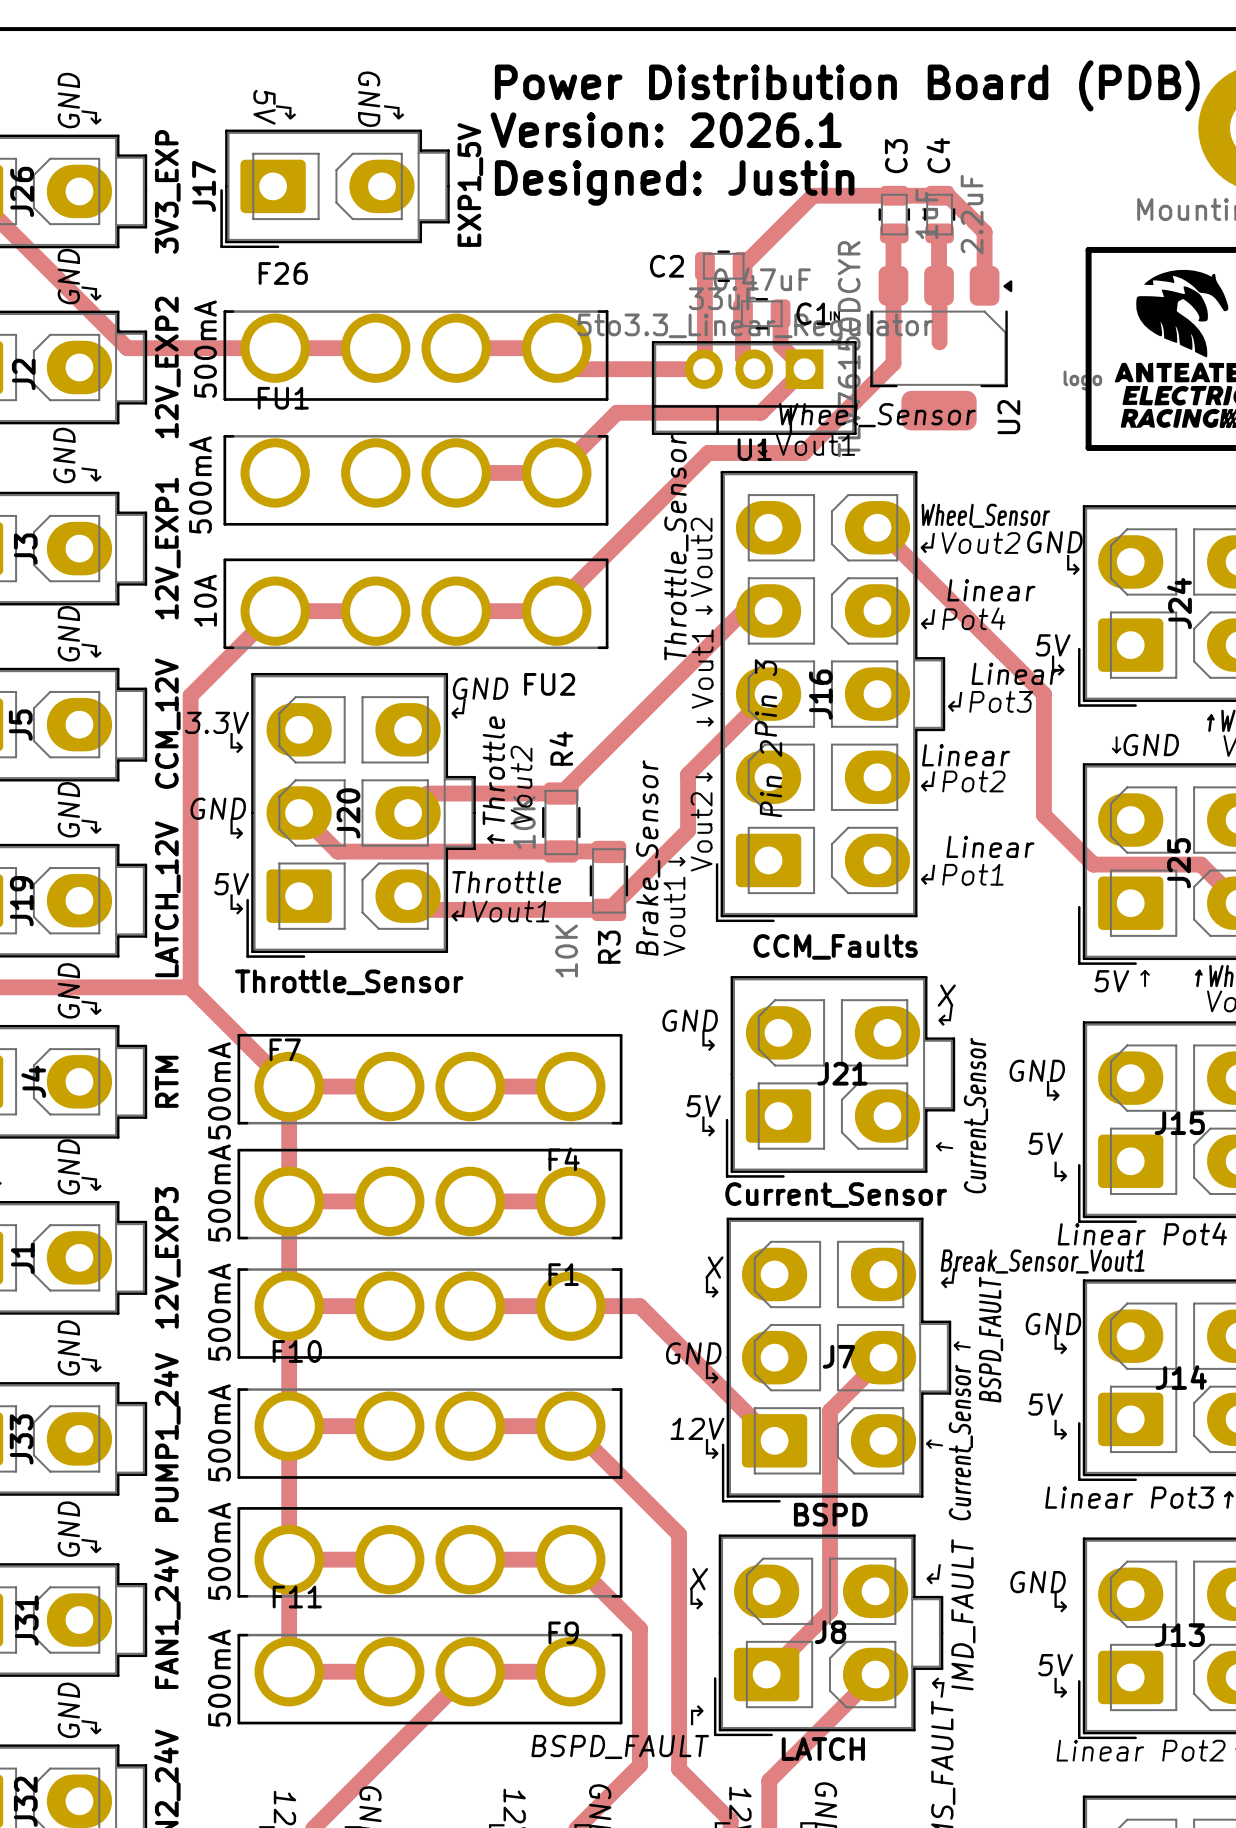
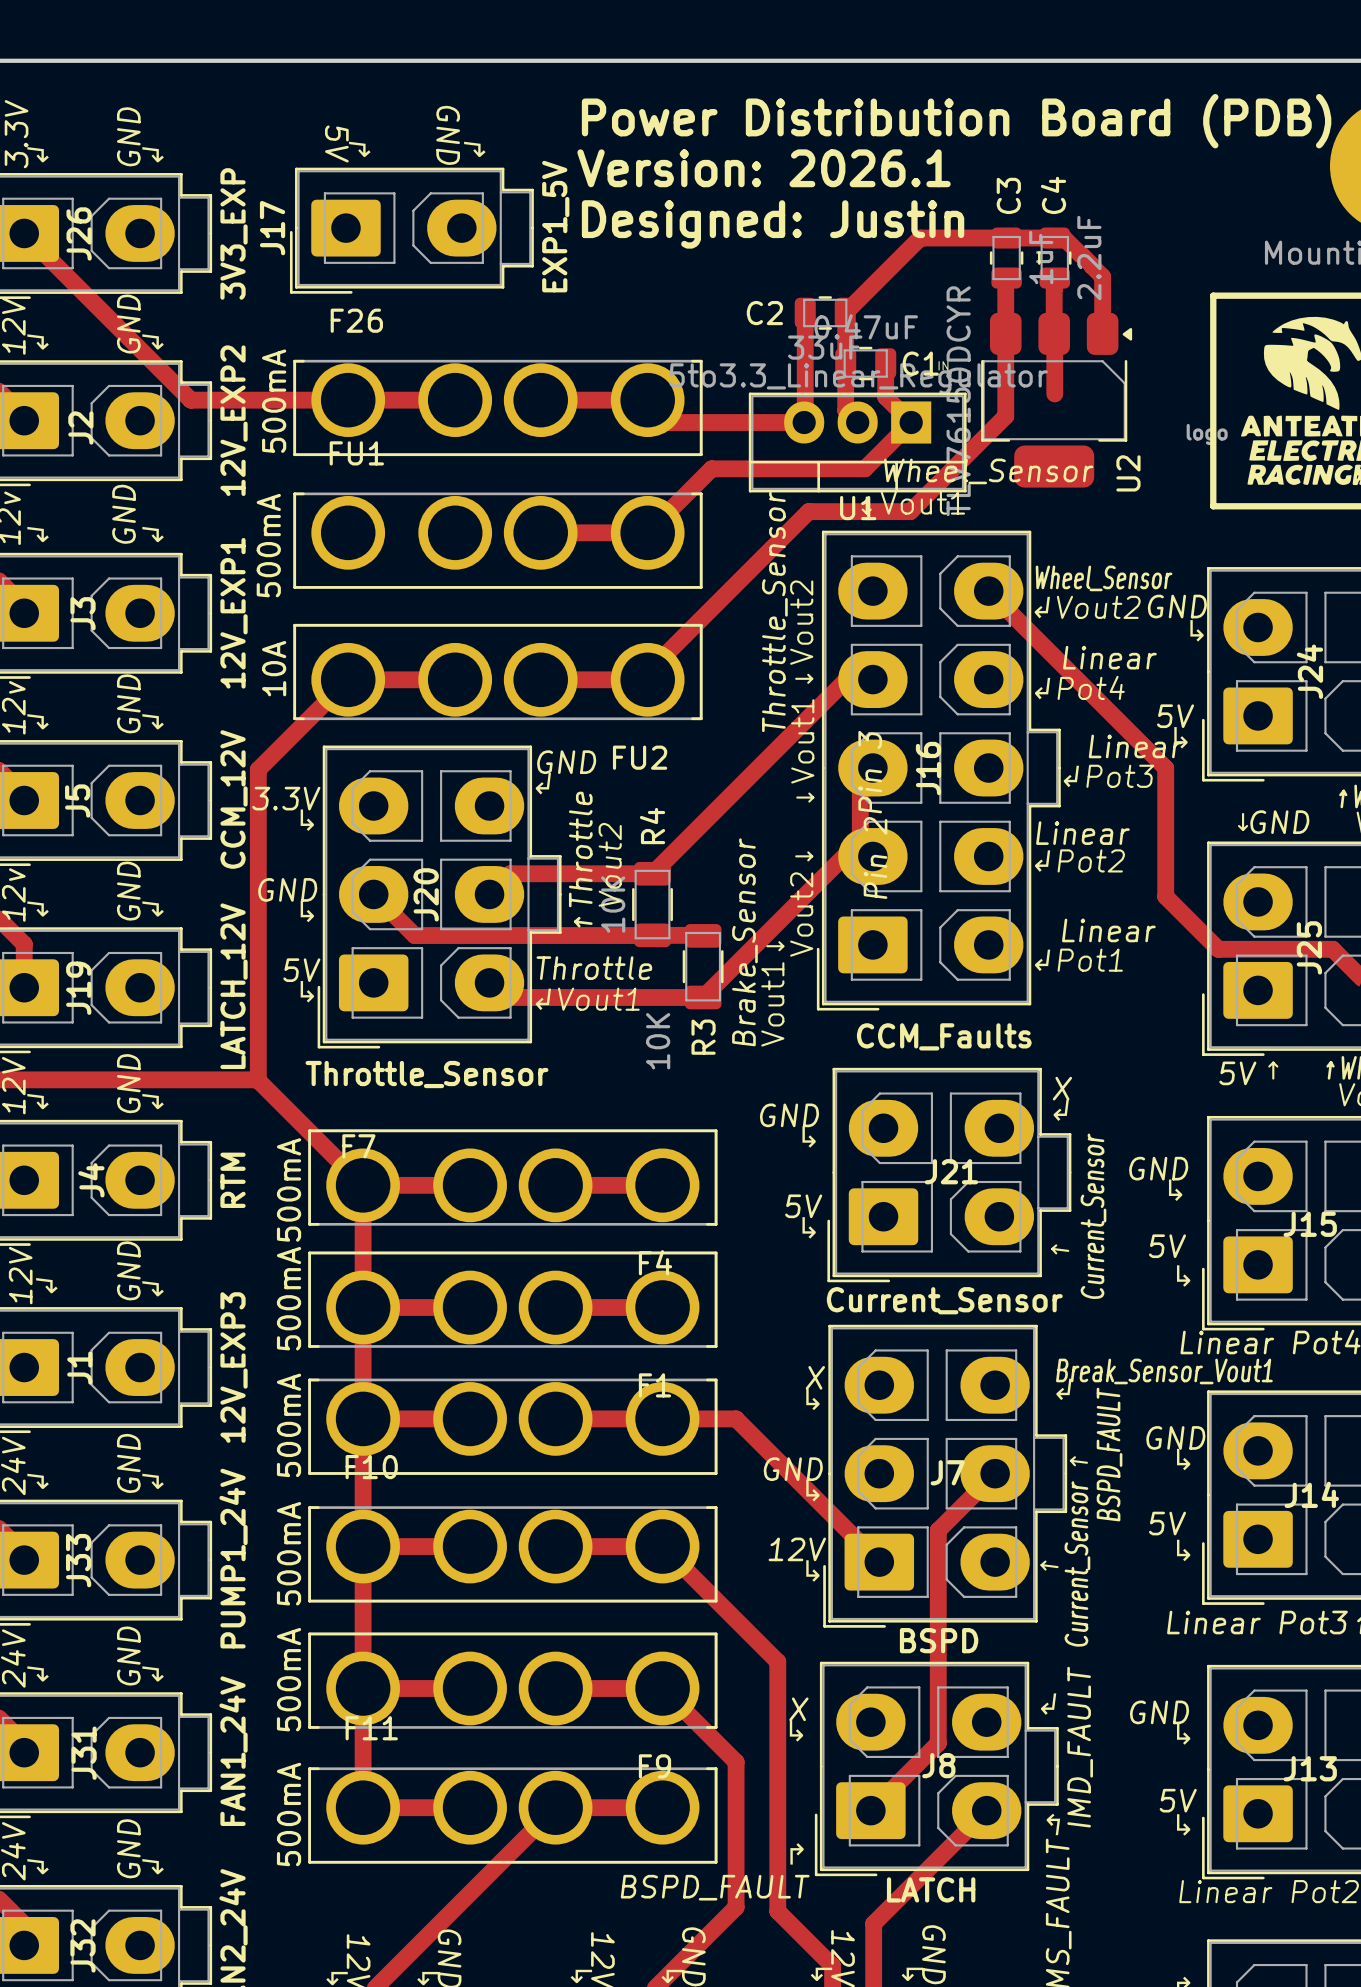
track: (756, 705) (688, 774) (688, 830) -> (860, 780) (860, 840) (787, 913)

